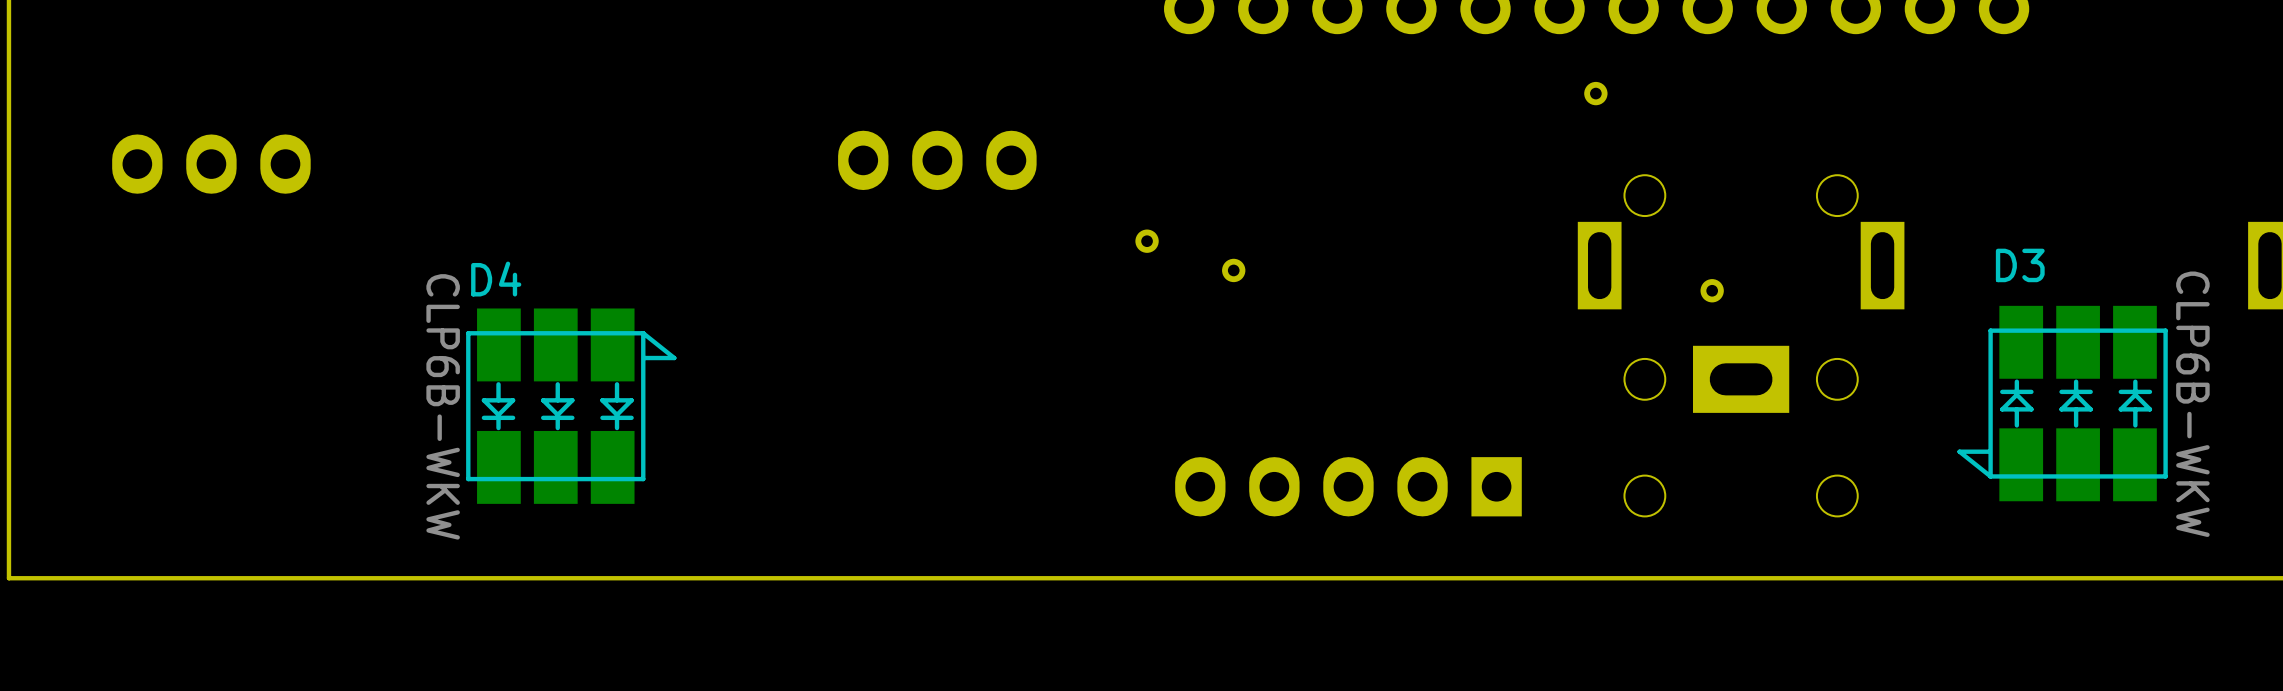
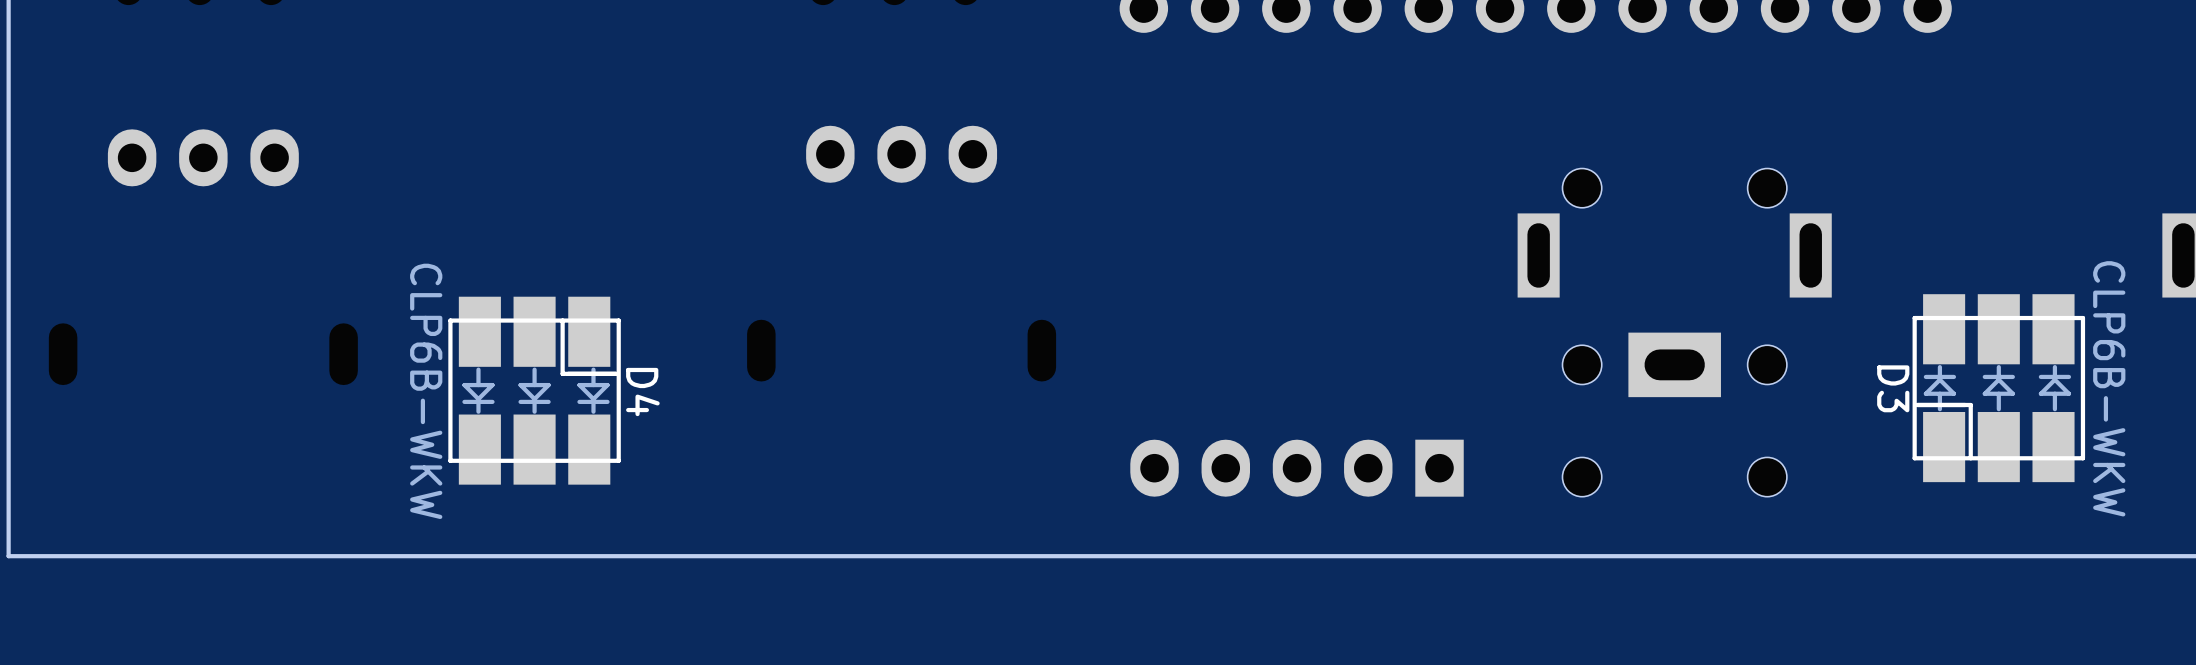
part: (1595, 93) -> none
part: (1147, 241) -> none
D3 name position: D3 (2020, 265) -> D3 (1893, 388)
part: (1233, 270) -> none
D4 name position: D4 (496, 279) -> D4 (642, 392)
part: (1712, 290) -> none
D3 footprint: [1957, 305, 2168, 502] -> [1912, 294, 2086, 483]
D4 footprint: [466, 308, 677, 504] -> [448, 296, 621, 485]

